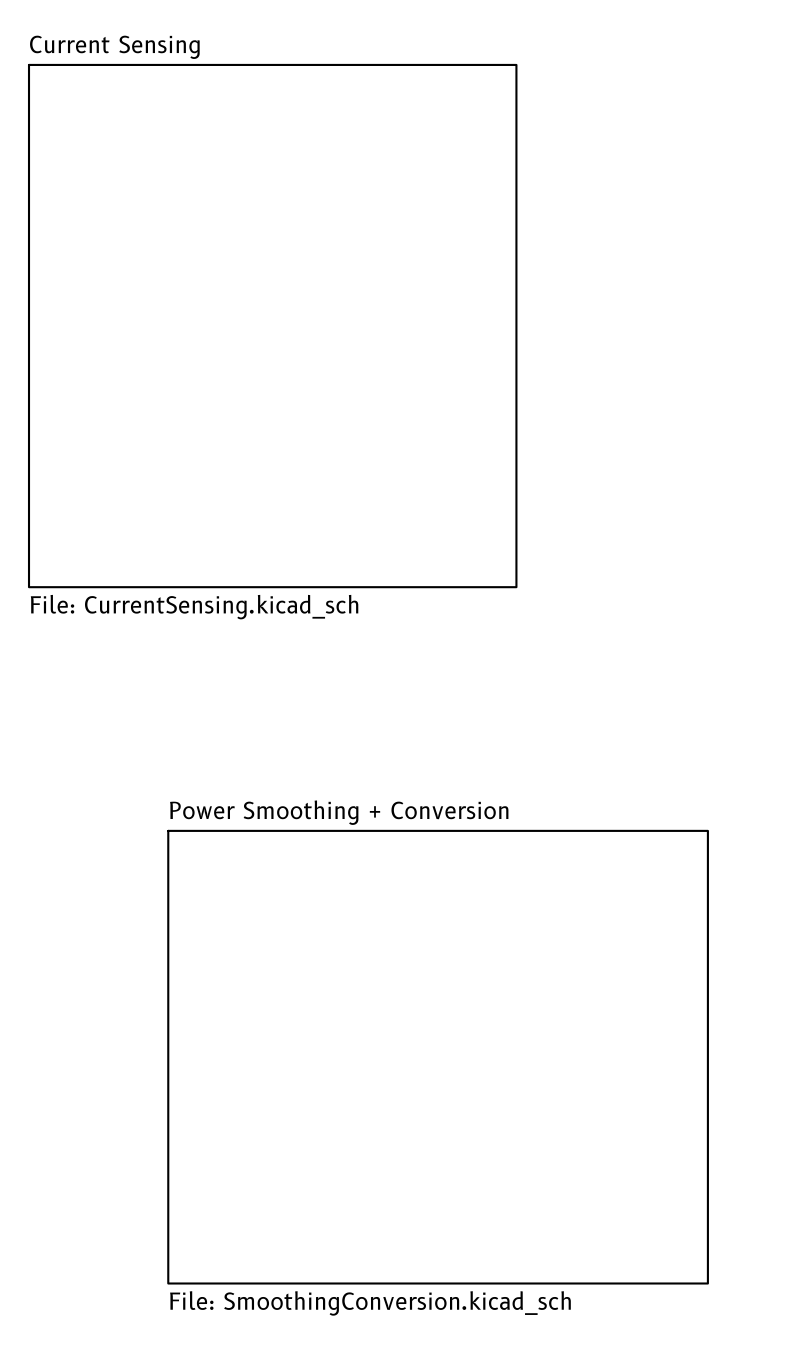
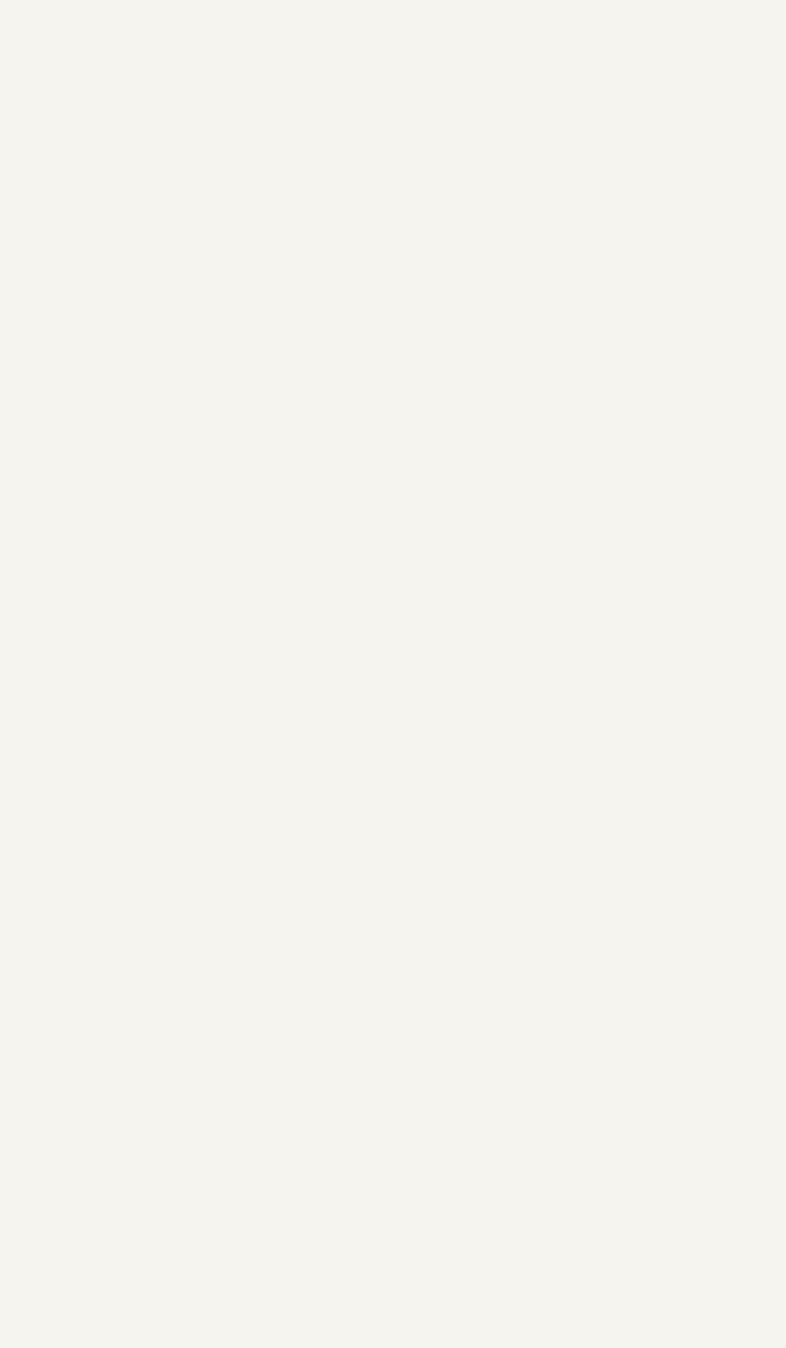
sheet Current Sensing: File: CurrentSensing.kicad_sch (272, 326) -> none
sheet Power Smoothing + Conversion: File: SmoothingConversion.kicad_sch (438, 1057) -> none

